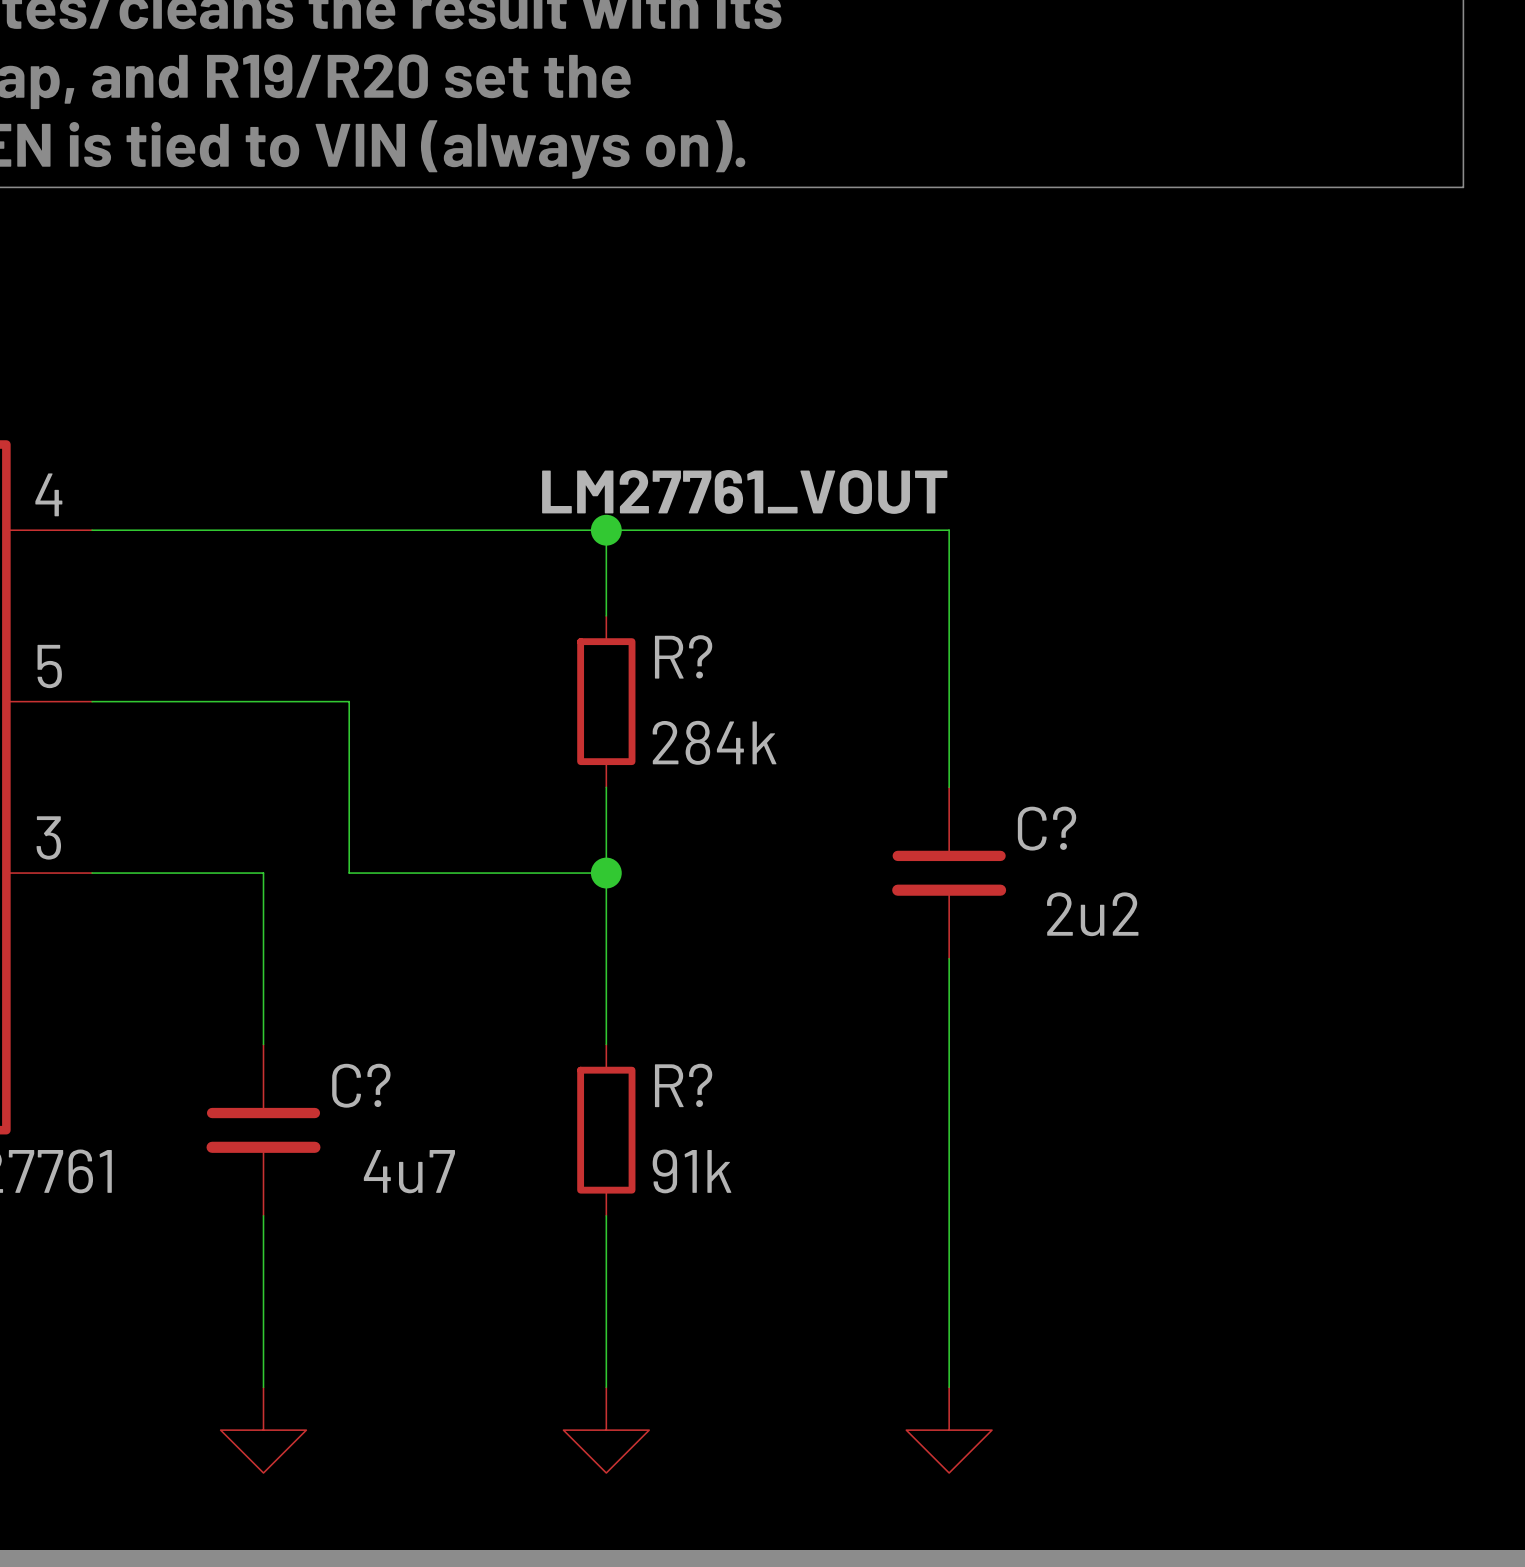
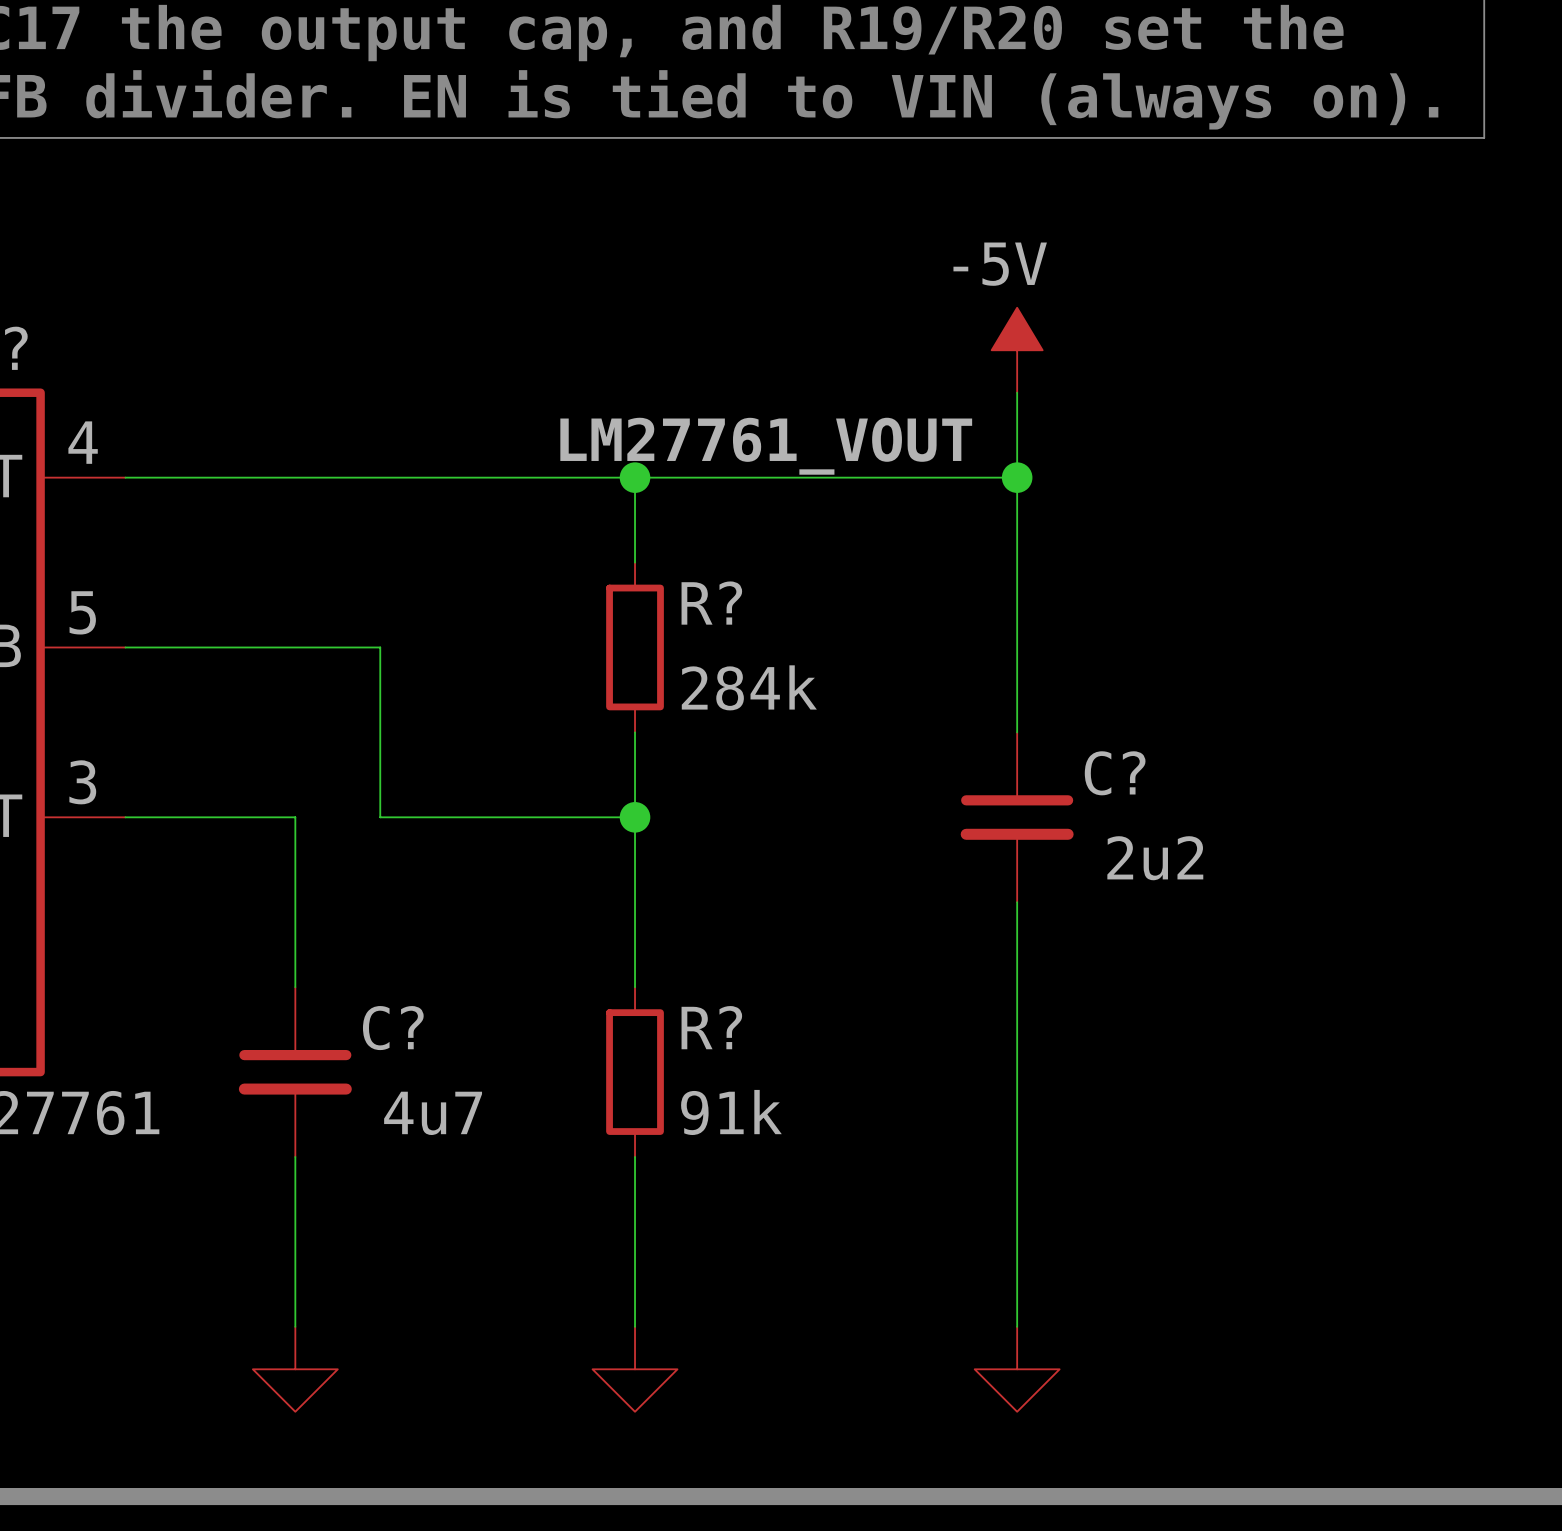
power symbol: none -> -5V (1017, 350)
wire: none -> (1017, 392) (1017, 732)
wire: (949, 530) (949, 787) -> (974, 477) (1017, 477)
junction: none -> (1017, 477)
C? position: (949, 873) -> (1017, 817)
wire: (949, 958) (949, 1387) -> (1017, 902) (1017, 1326)
power symbol position: (949, 1430) -> (1017, 1369)

